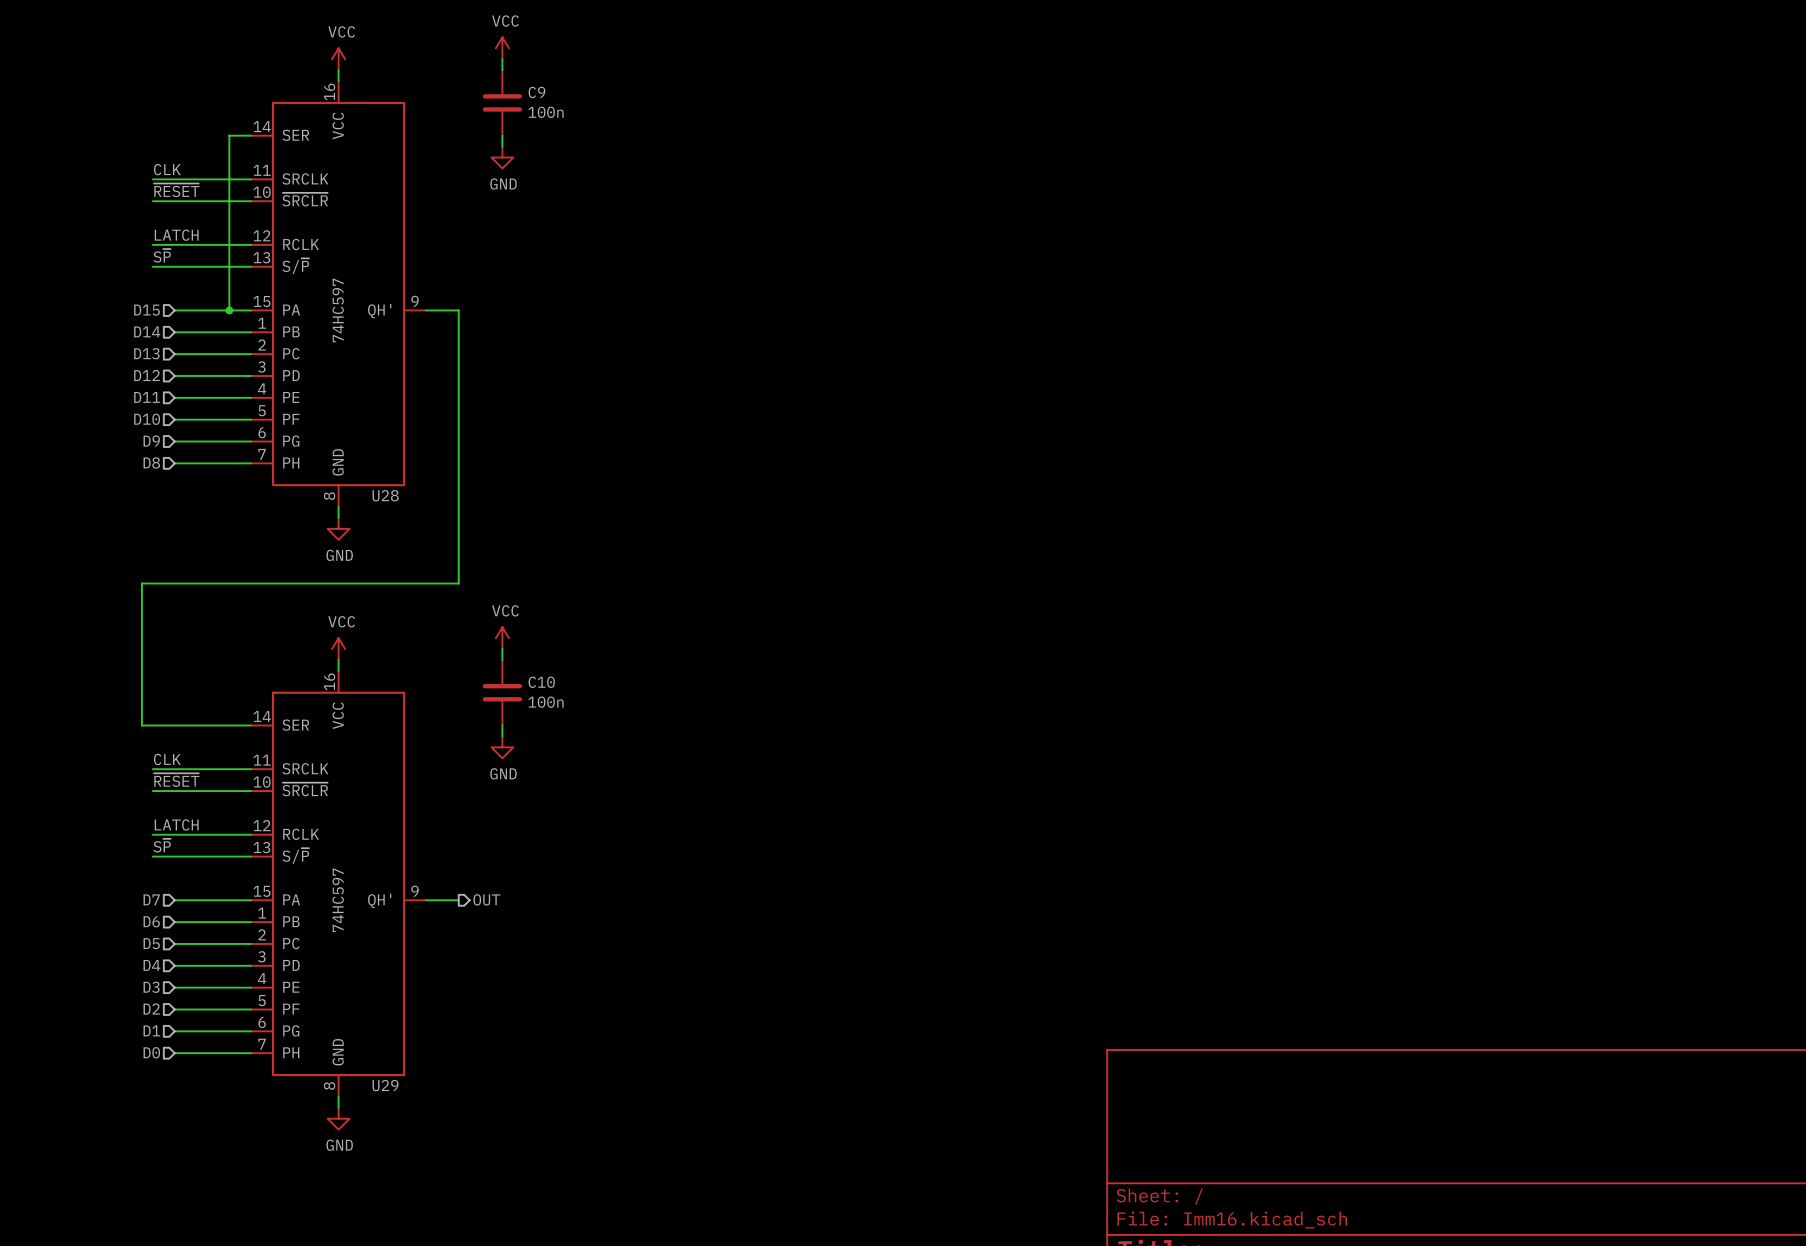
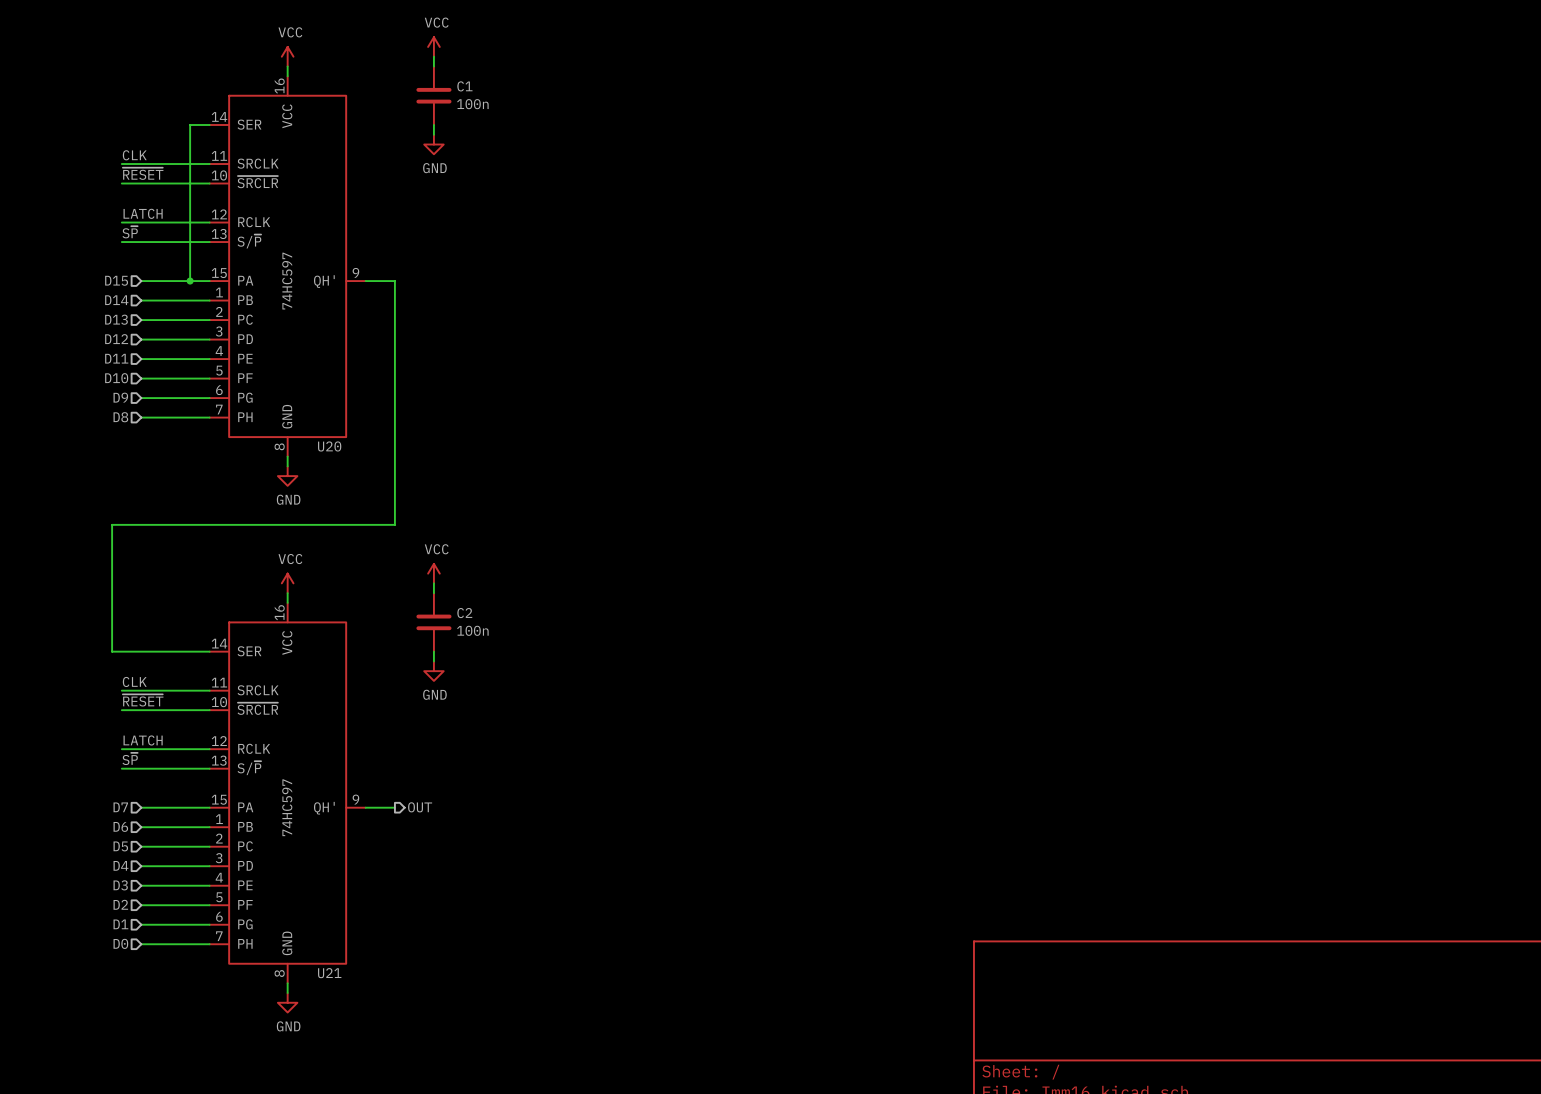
C9 name: C9 (536, 92) -> C1 (464, 86)
U28 name: U28 (385, 495) -> U20 (329, 446)
C10 name: C10 (541, 682) -> C2 (464, 613)
U29 name: U29 (385, 1085) -> U21 (329, 973)

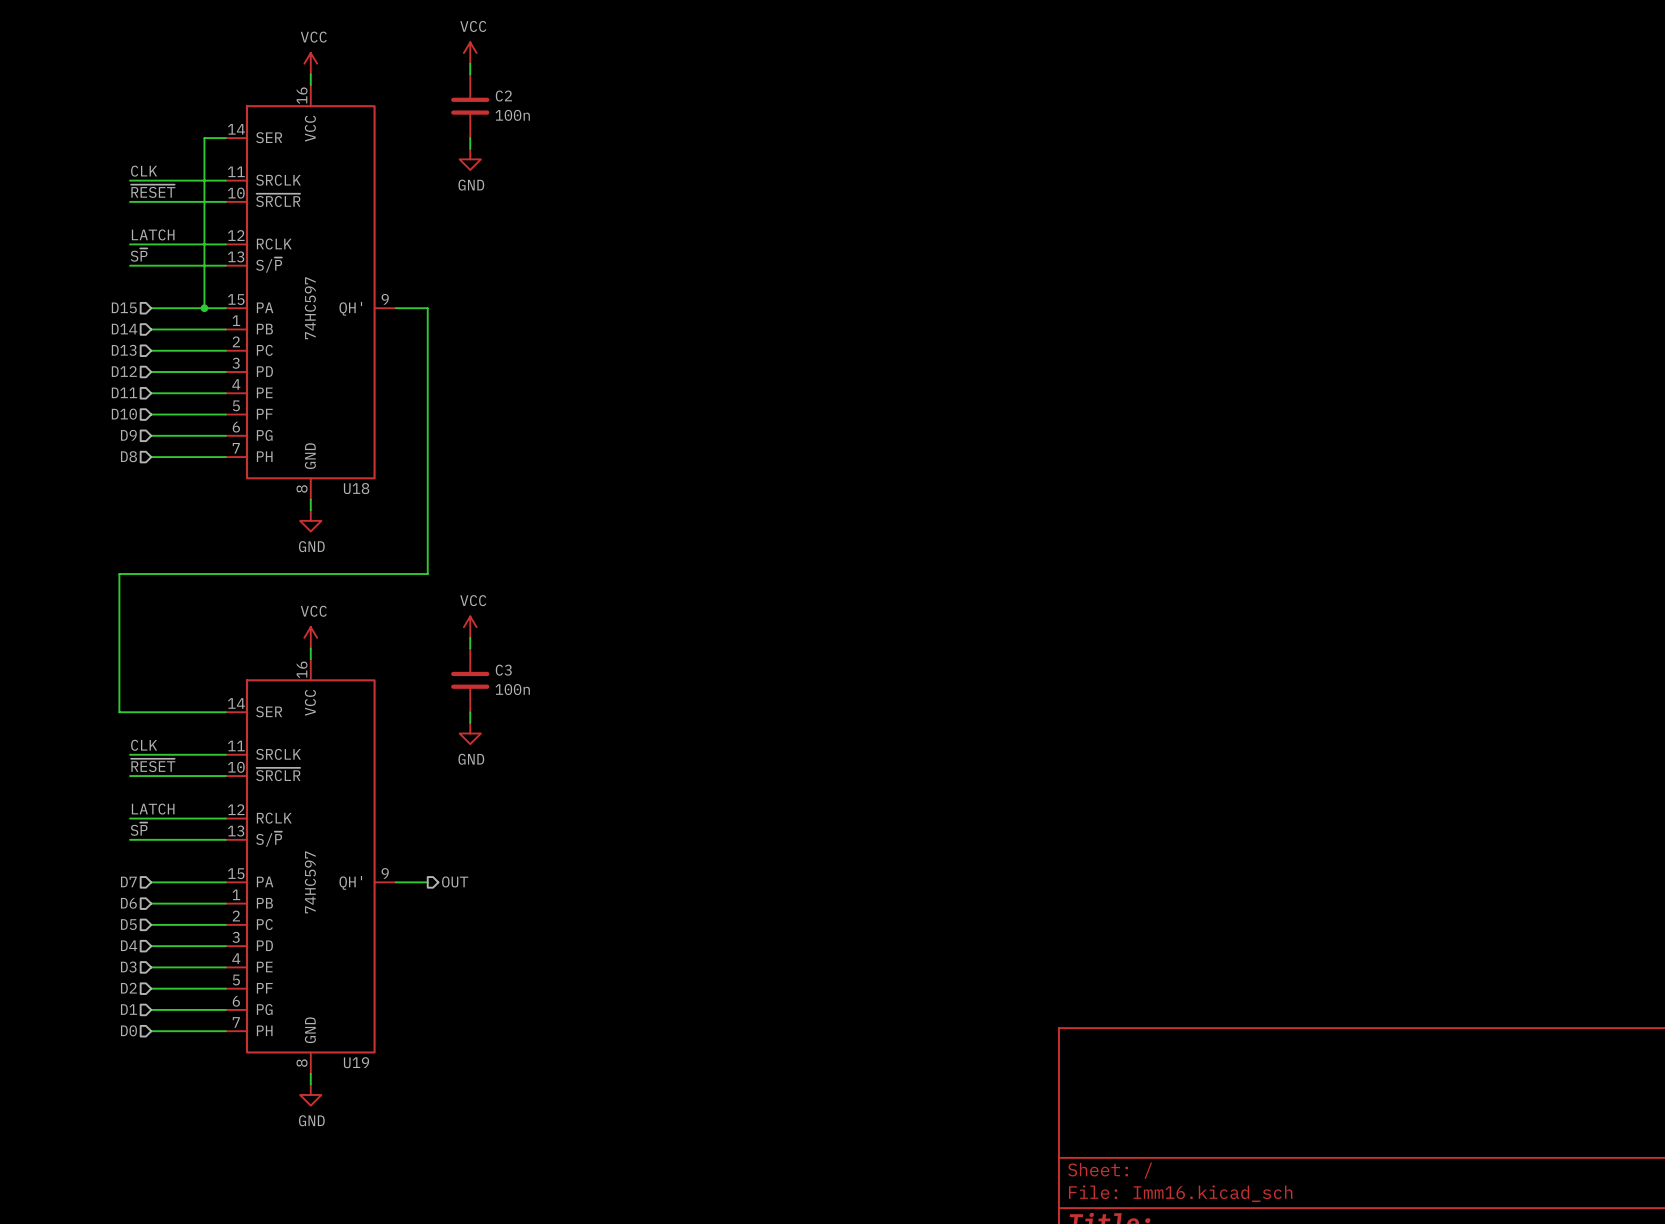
C1 name: C1 (464, 86) -> C2 (503, 96)
U20 name: U20 (329, 446) -> U18 (356, 488)
C2 name: C2 (464, 613) -> C3 (503, 670)
U21 name: U21 (329, 973) -> U19 (356, 1062)

